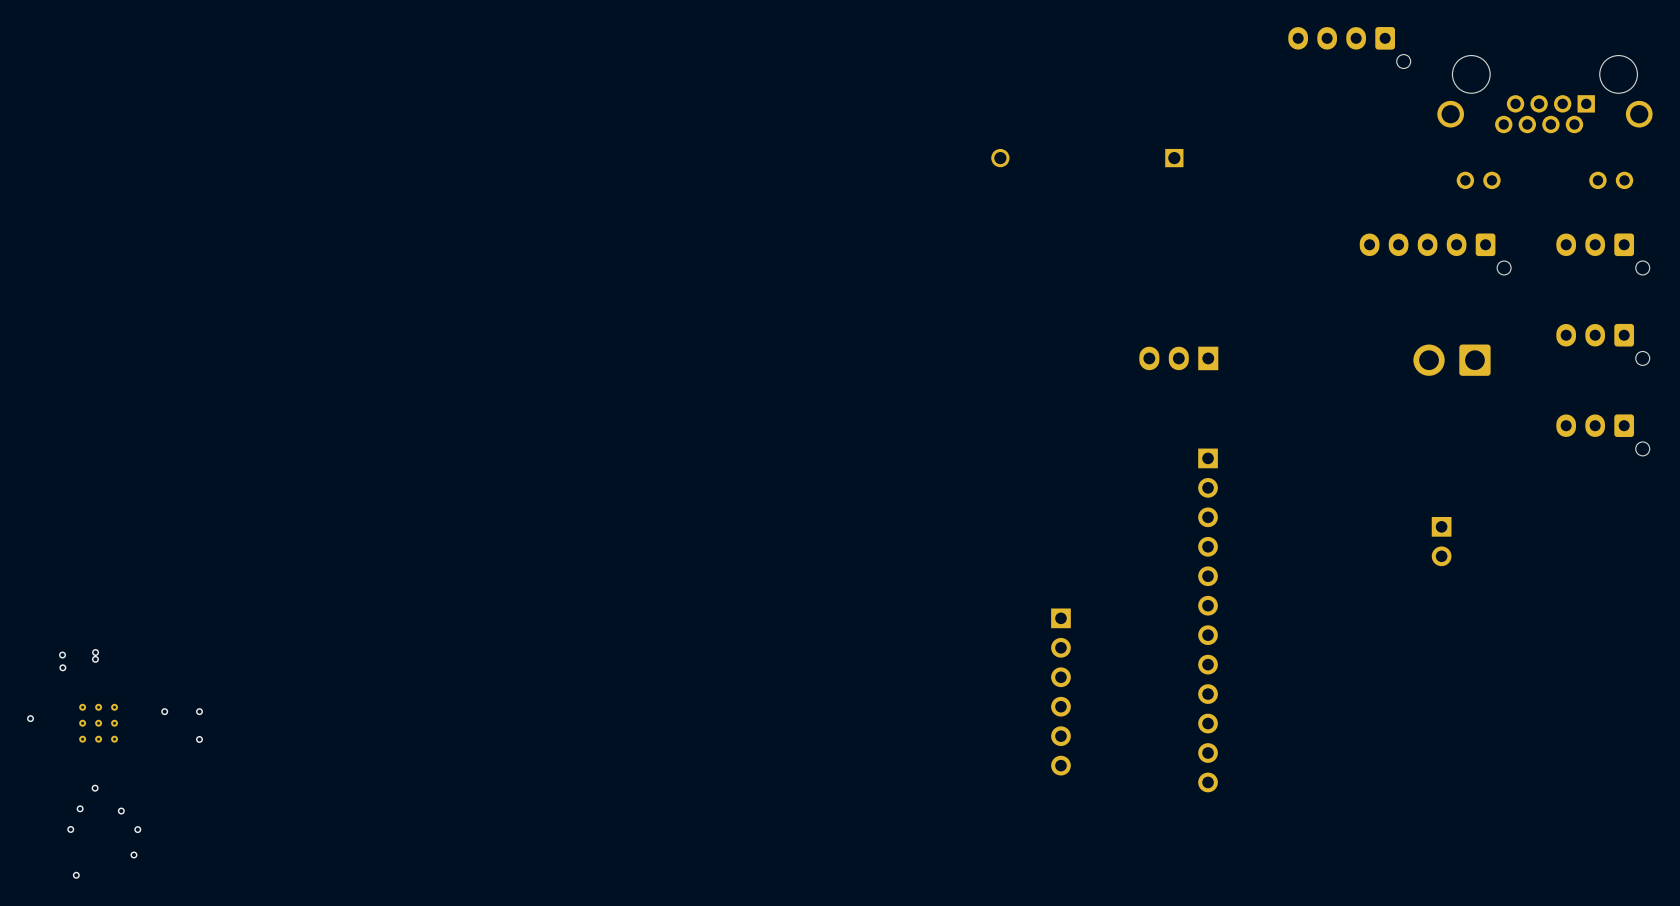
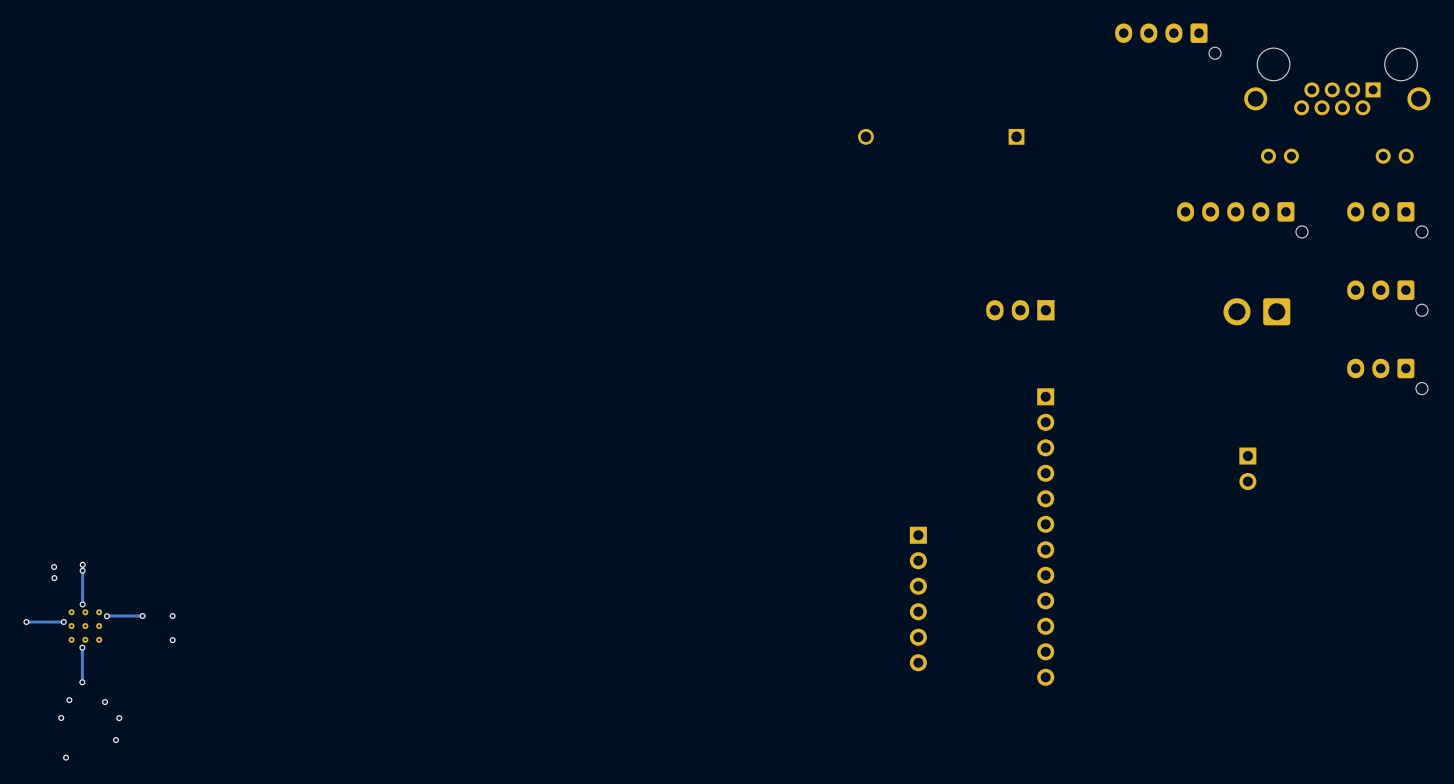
track: none -> (82, 570) (82, 604)
via: none -> (82, 604)
via: none -> (106, 616)
track: none -> (142, 616) (107, 616)
track: none -> (63, 622) (26, 622)
via: none -> (63, 622)
track: none -> (82, 647) (82, 682)
via: none -> (82, 647)

